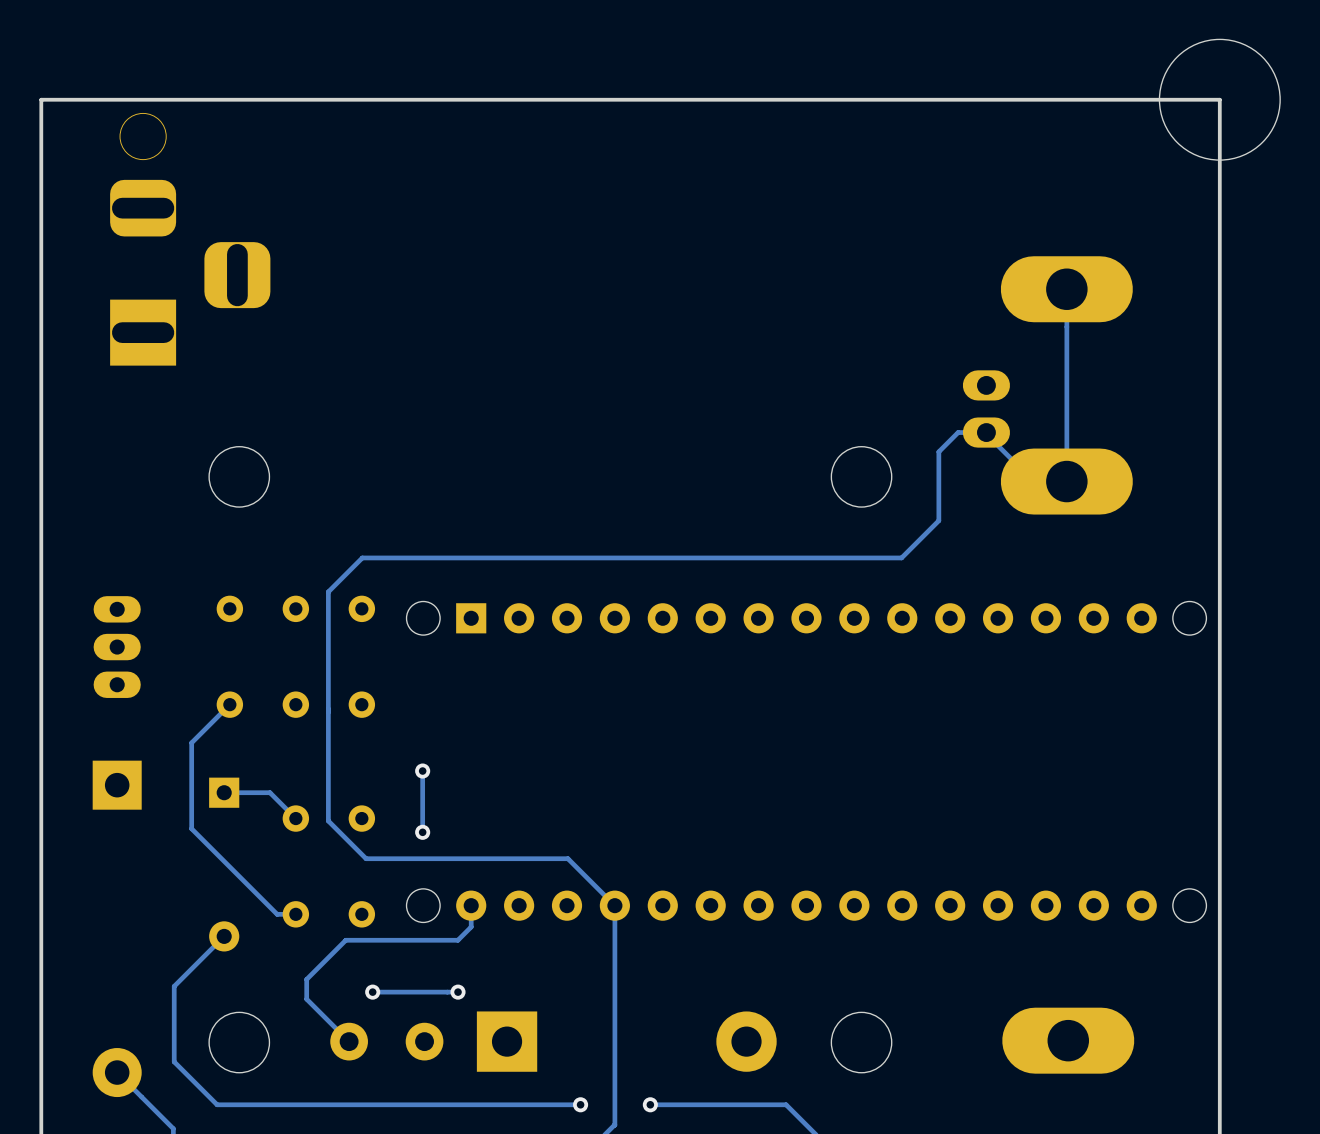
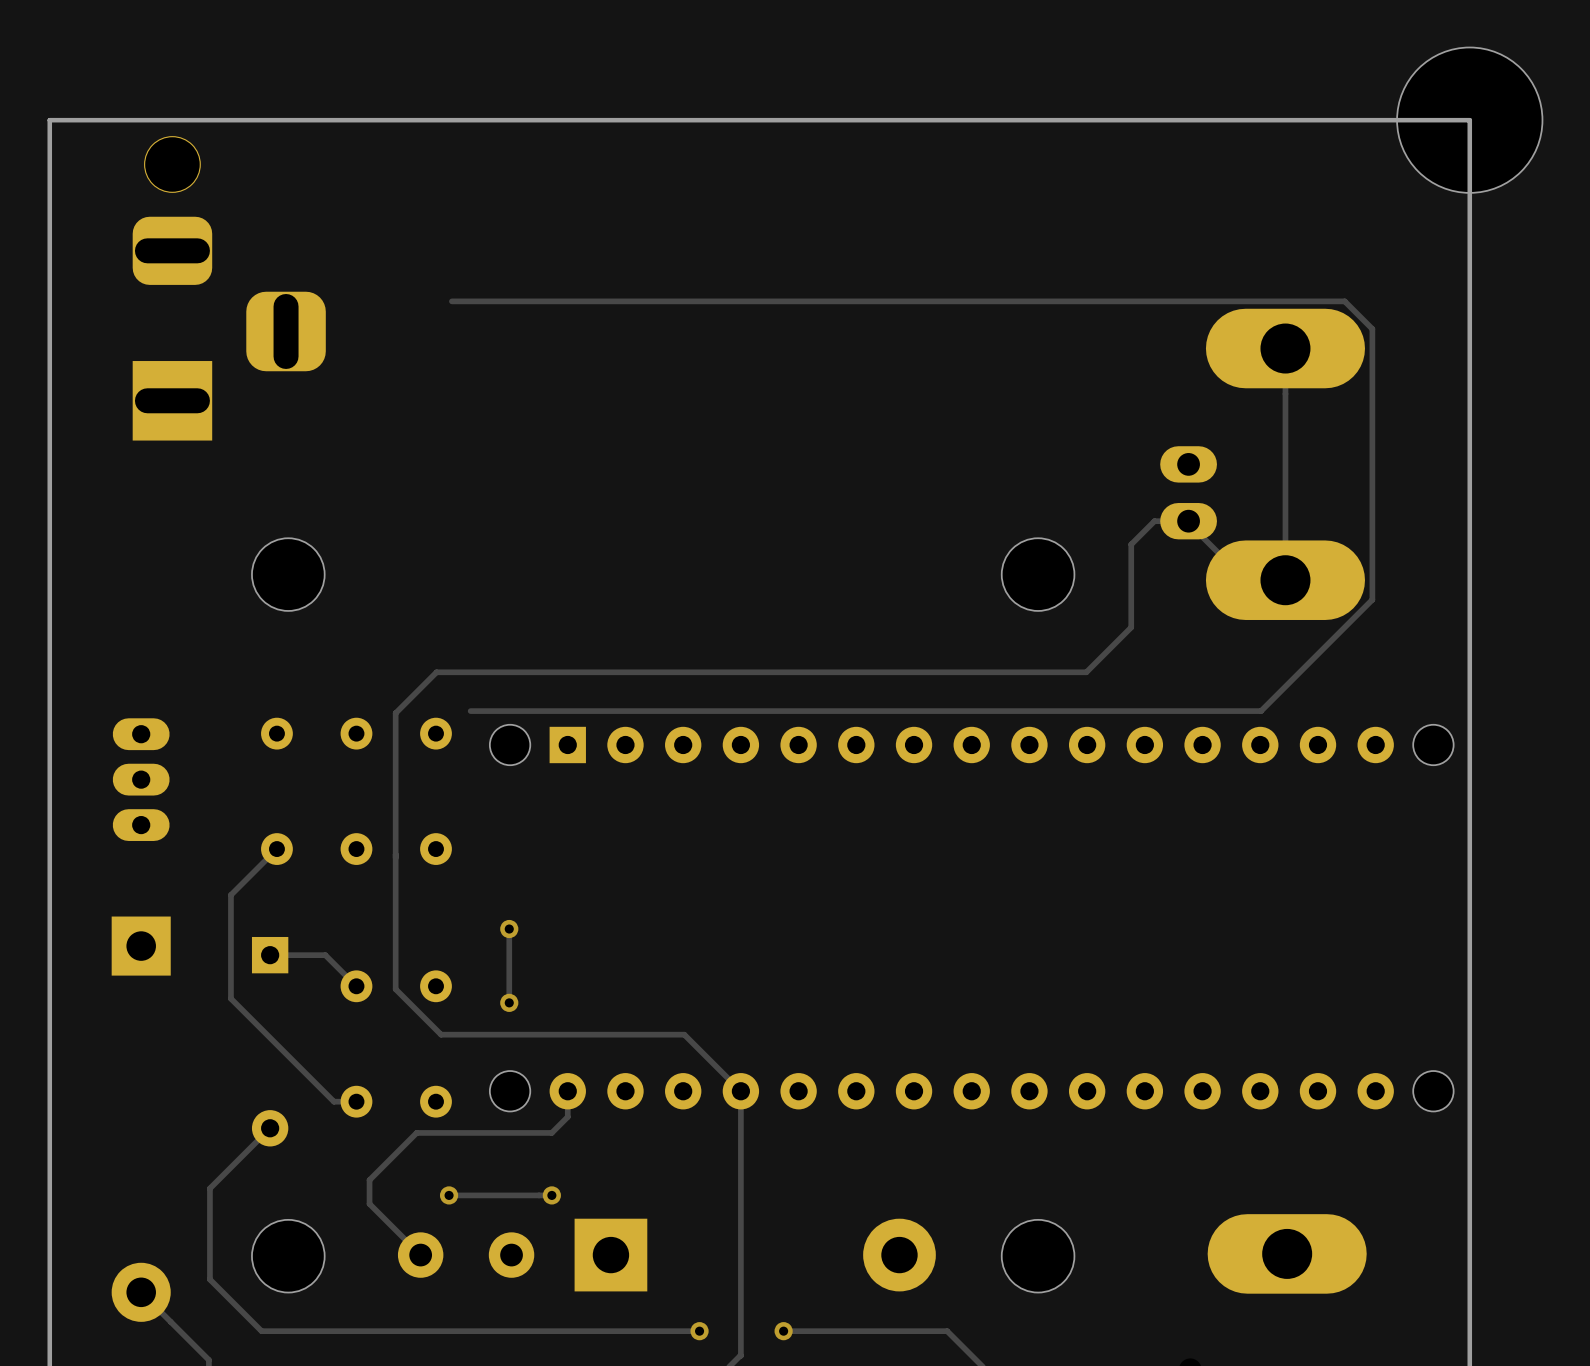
track: none -> (451, 301) (1344, 301) (1372, 328) (1372, 599) (1261, 711) (470, 711)

